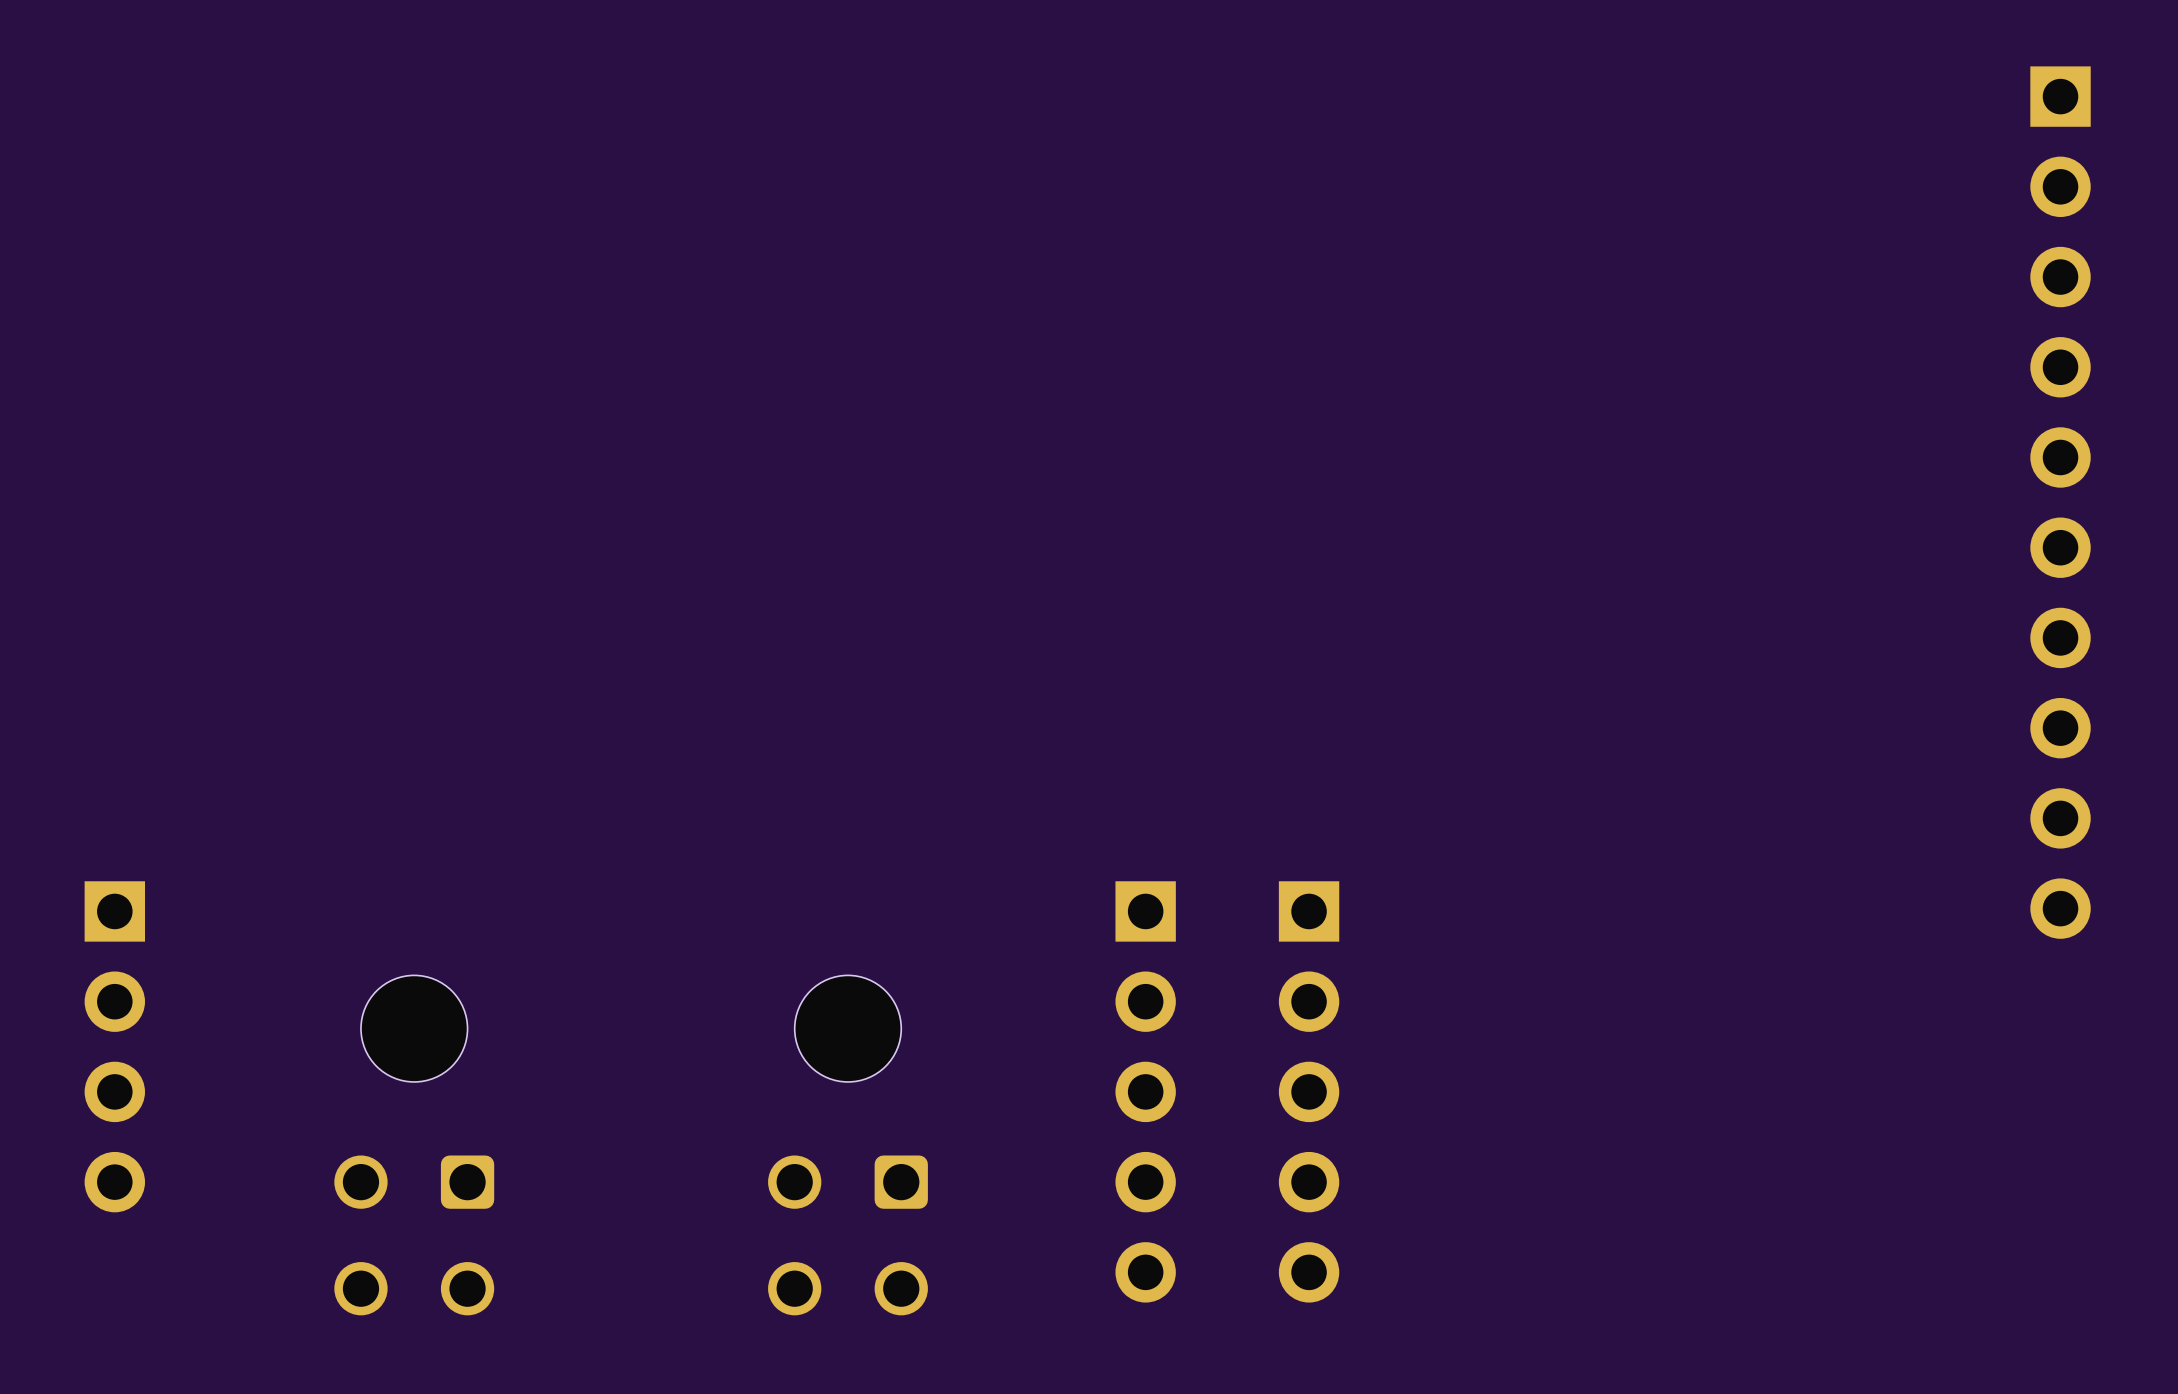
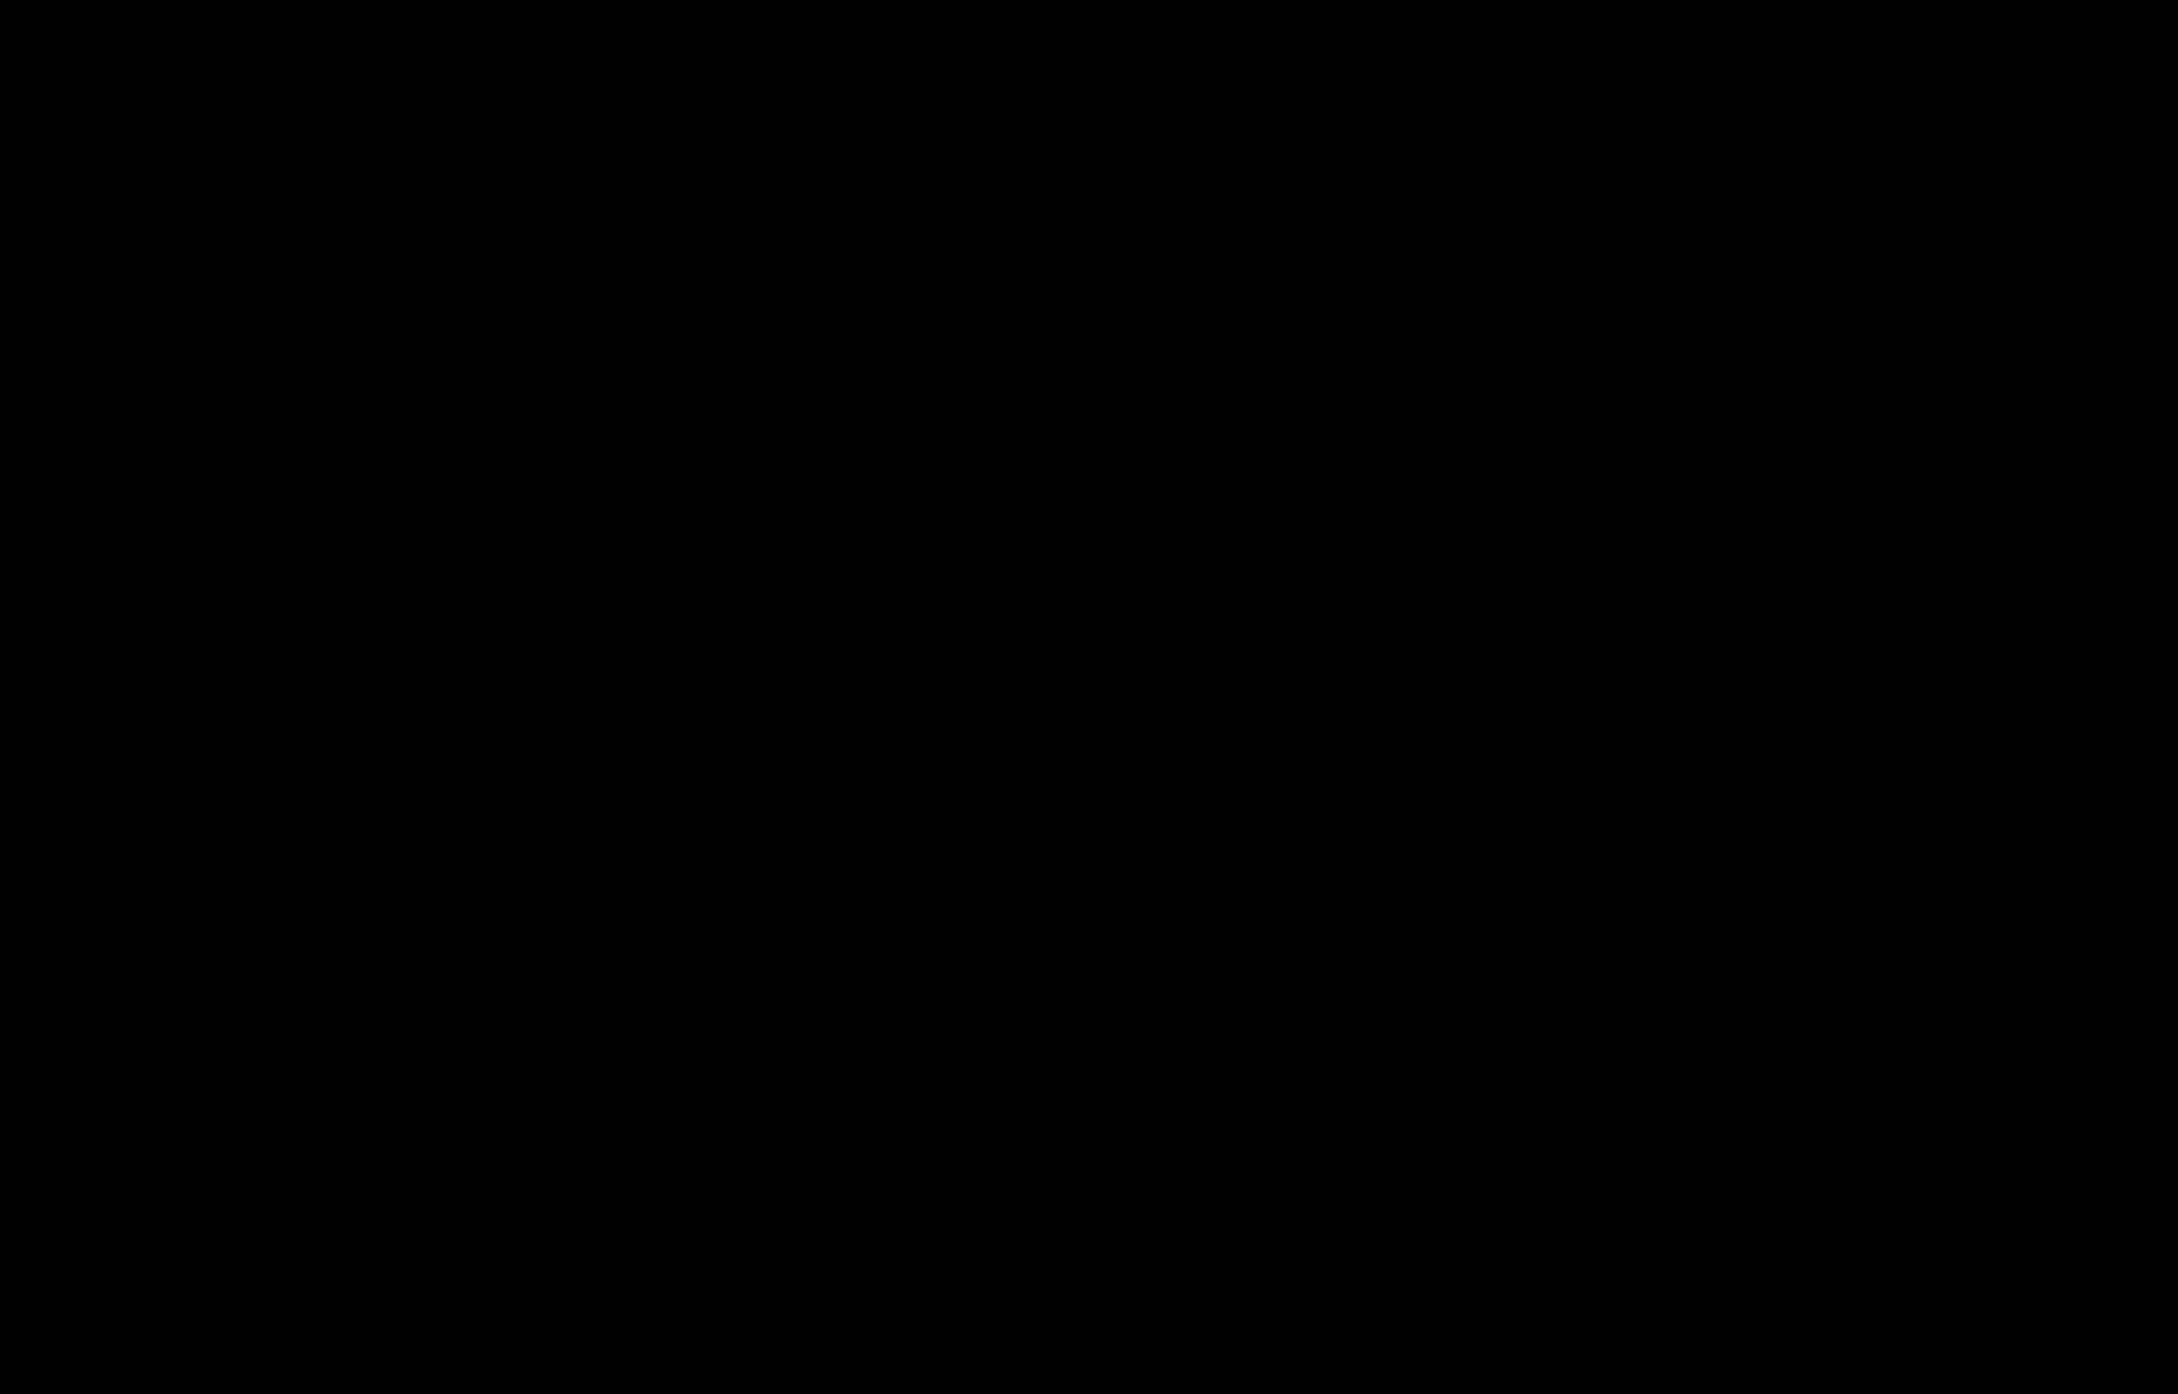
part: (2060, 502) -> none
part: (114, 1046) -> none
part: (1145, 1091) -> none
part: (1309, 1091) -> none
part: (414, 1145) -> none
part: (847, 1145) -> none

